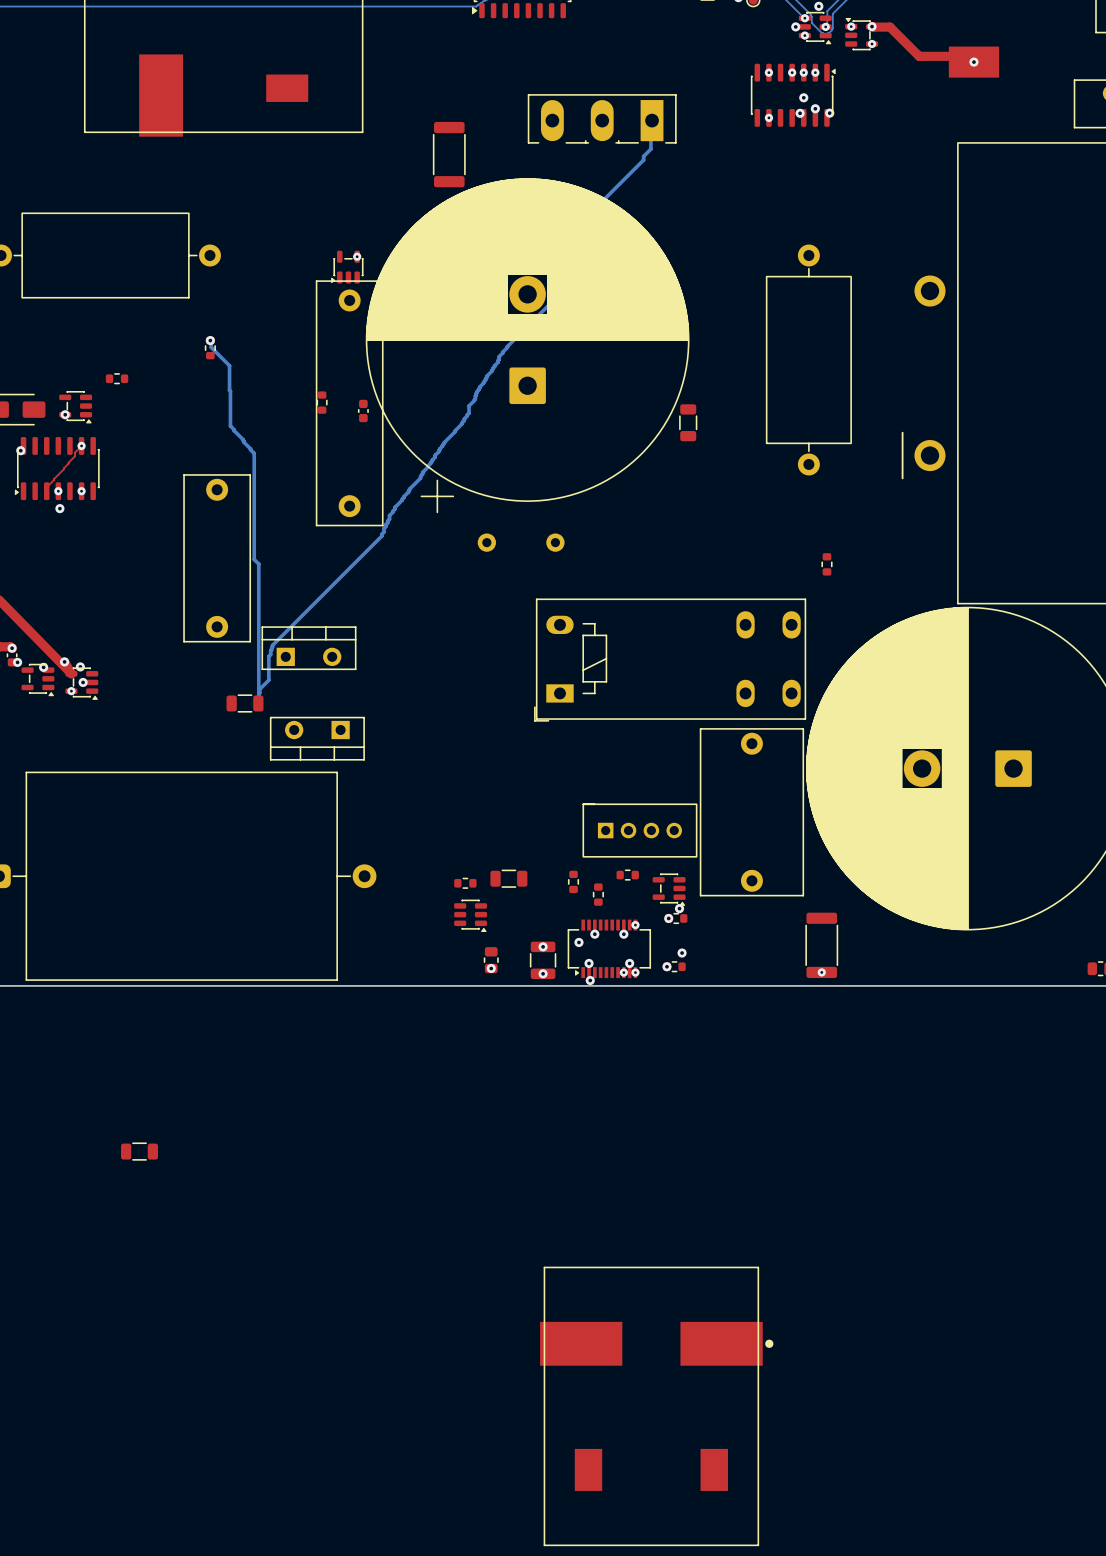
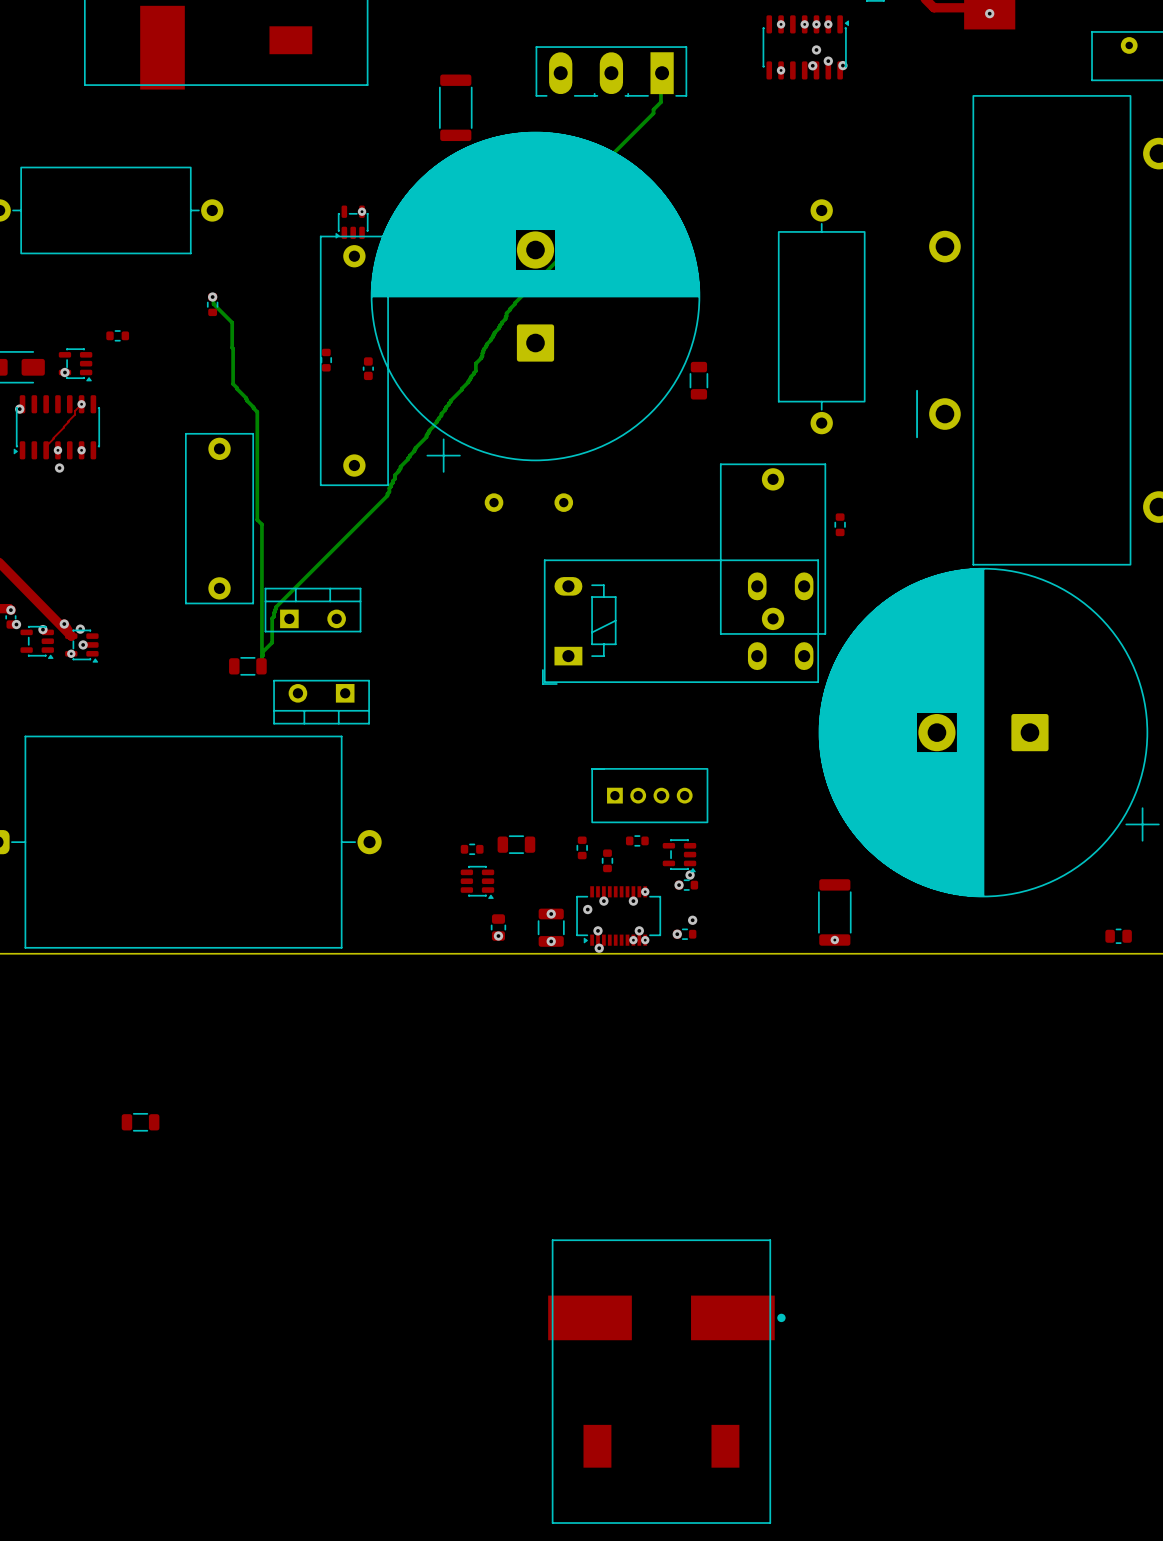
part position: (751, 812) -> (773, 549)

